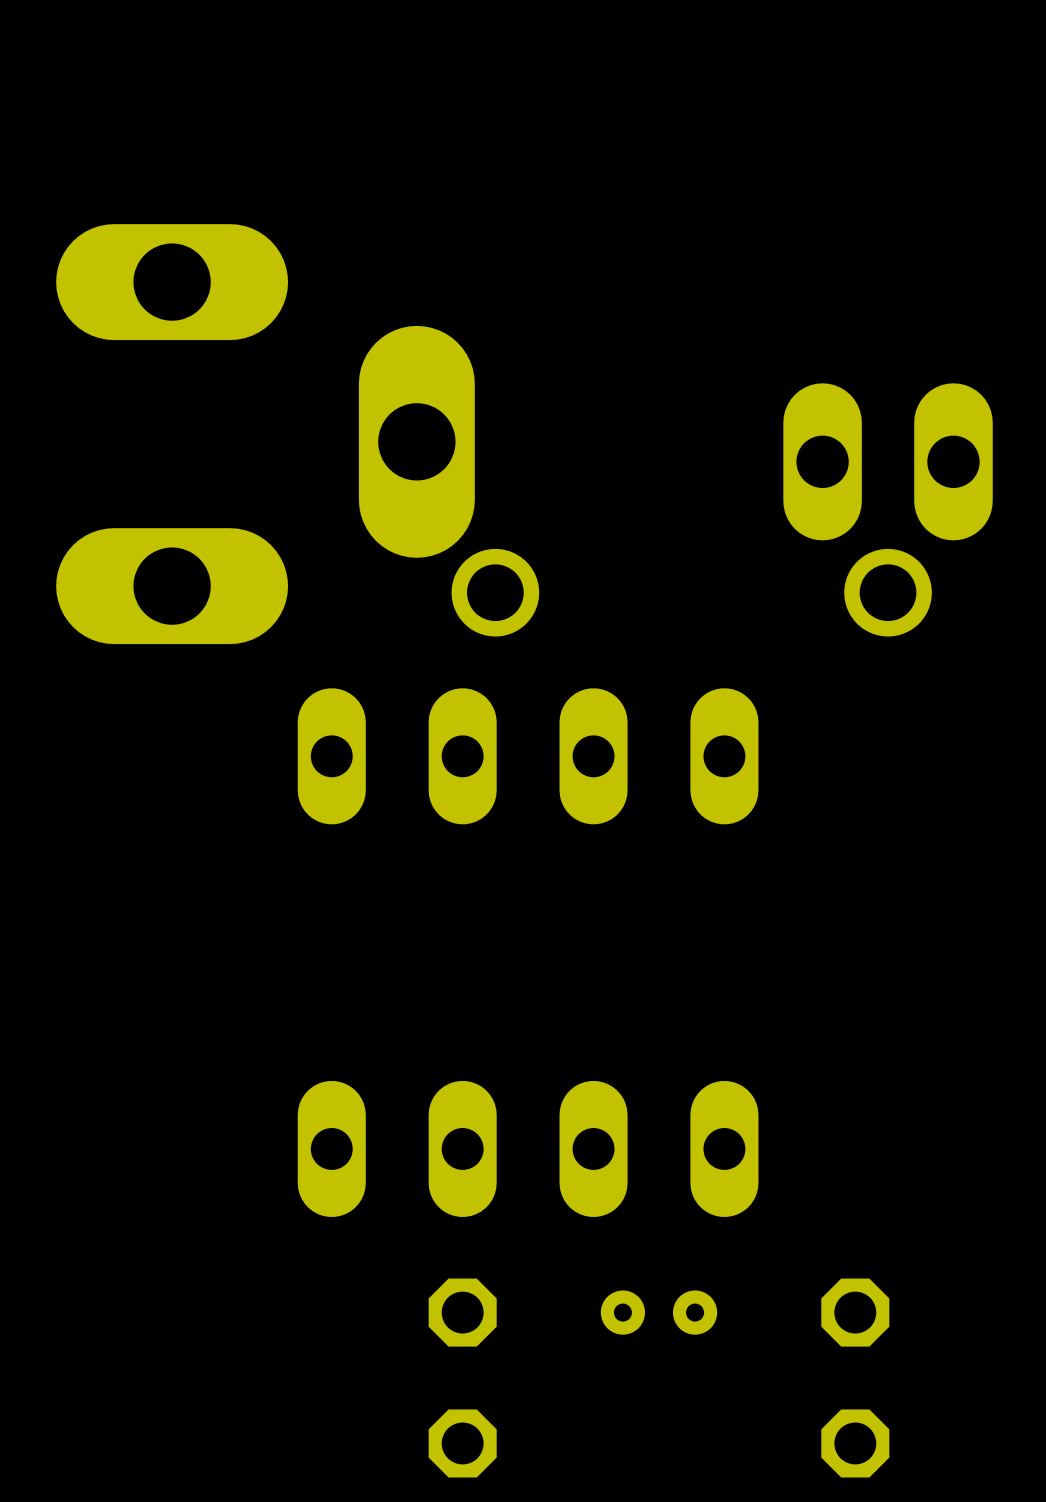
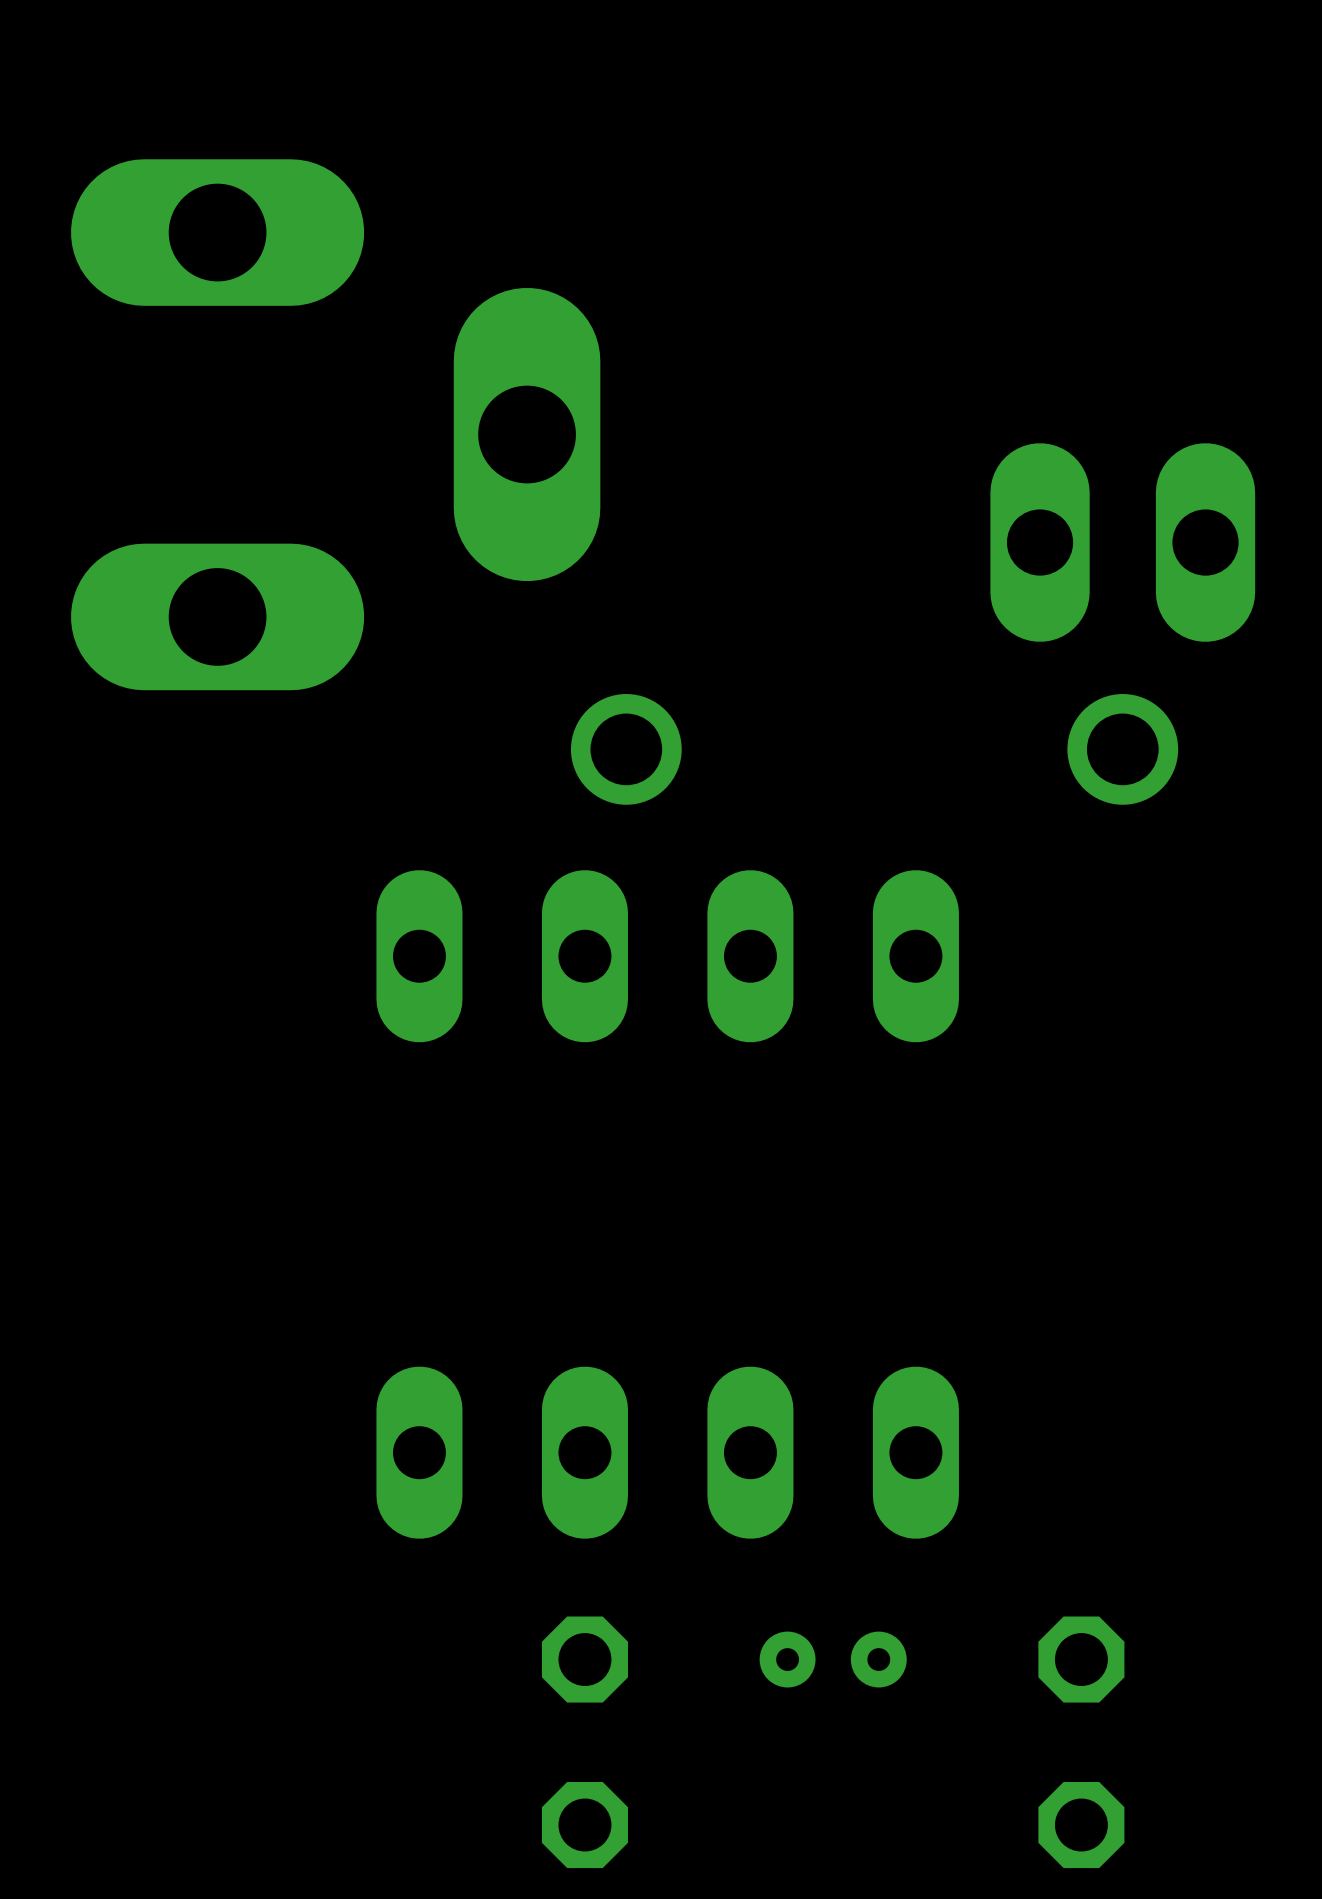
part position: (265, 434) -> (335, 424)
part position: (888, 461) -> (1122, 542)

